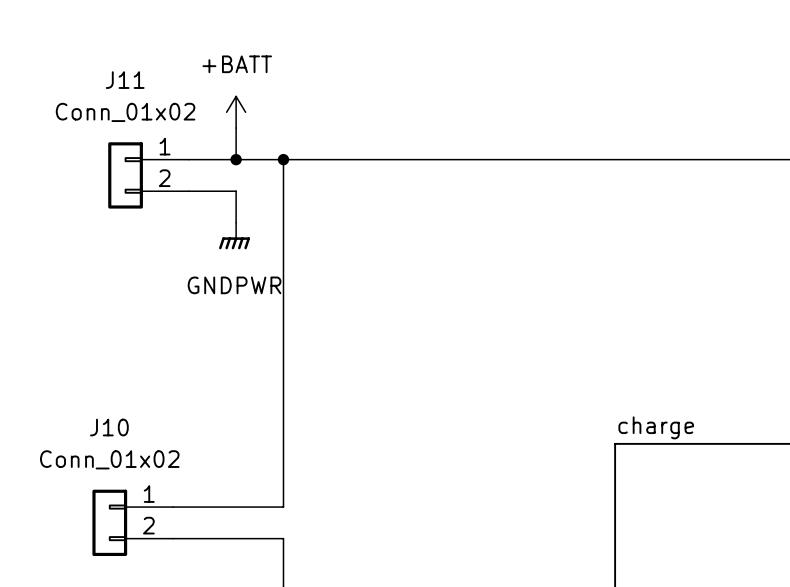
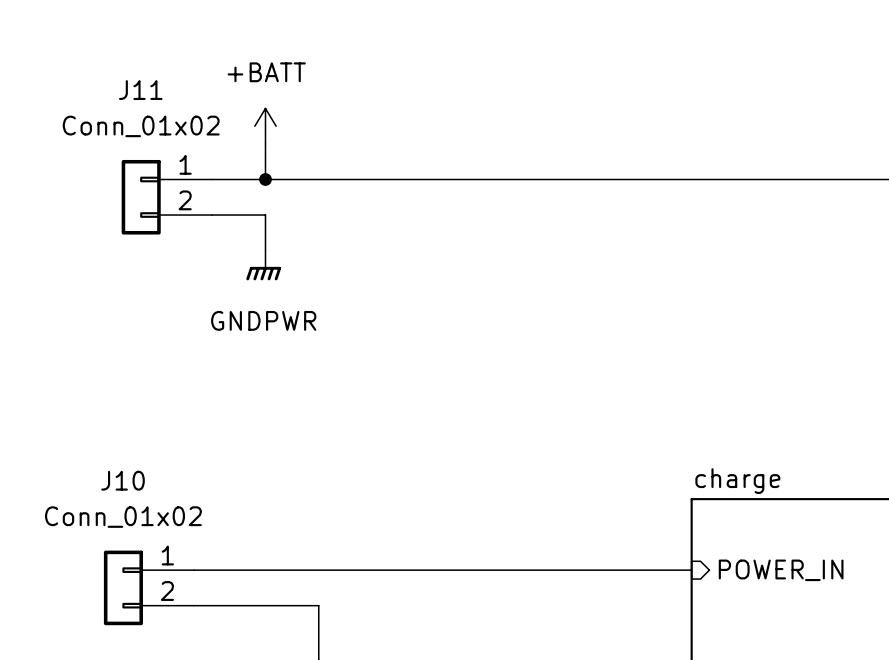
wire: (283, 159) (283, 507) -> (691, 570) (318, 570)
junction: (283, 159) -> none
sheet pin: none -> POWER_IN (781, 570)

